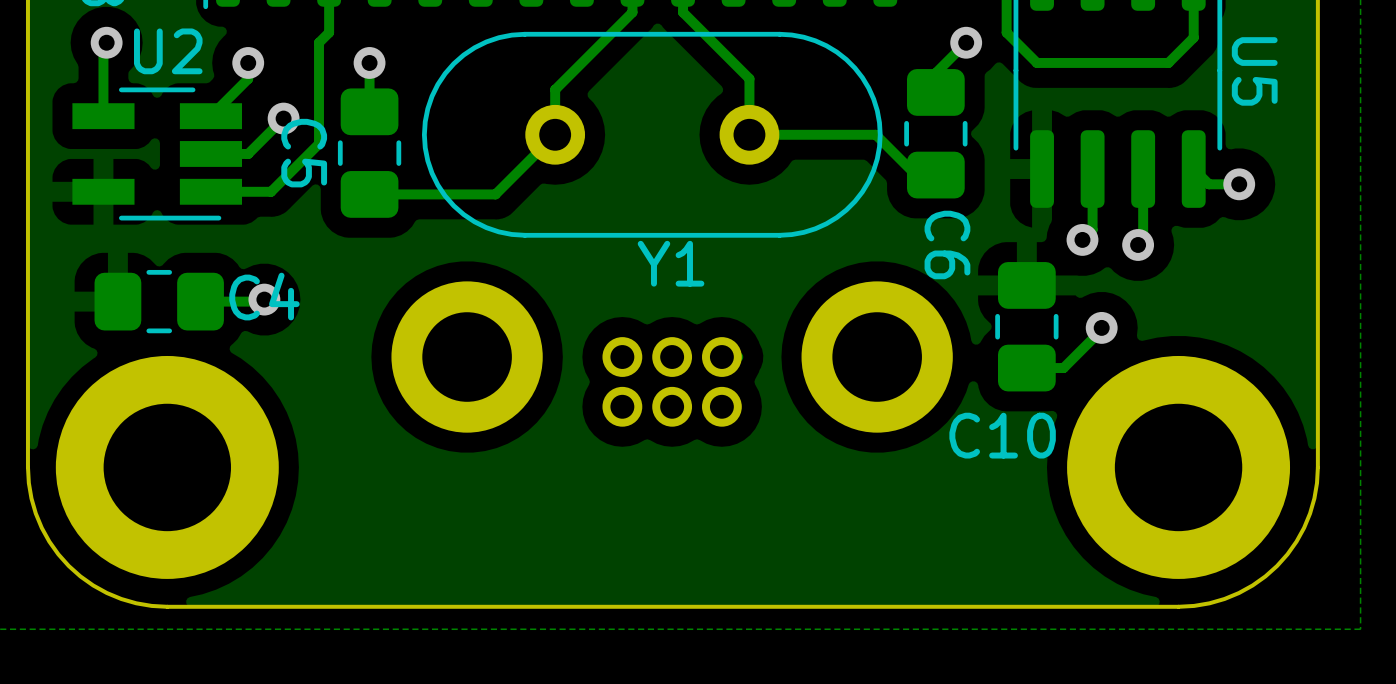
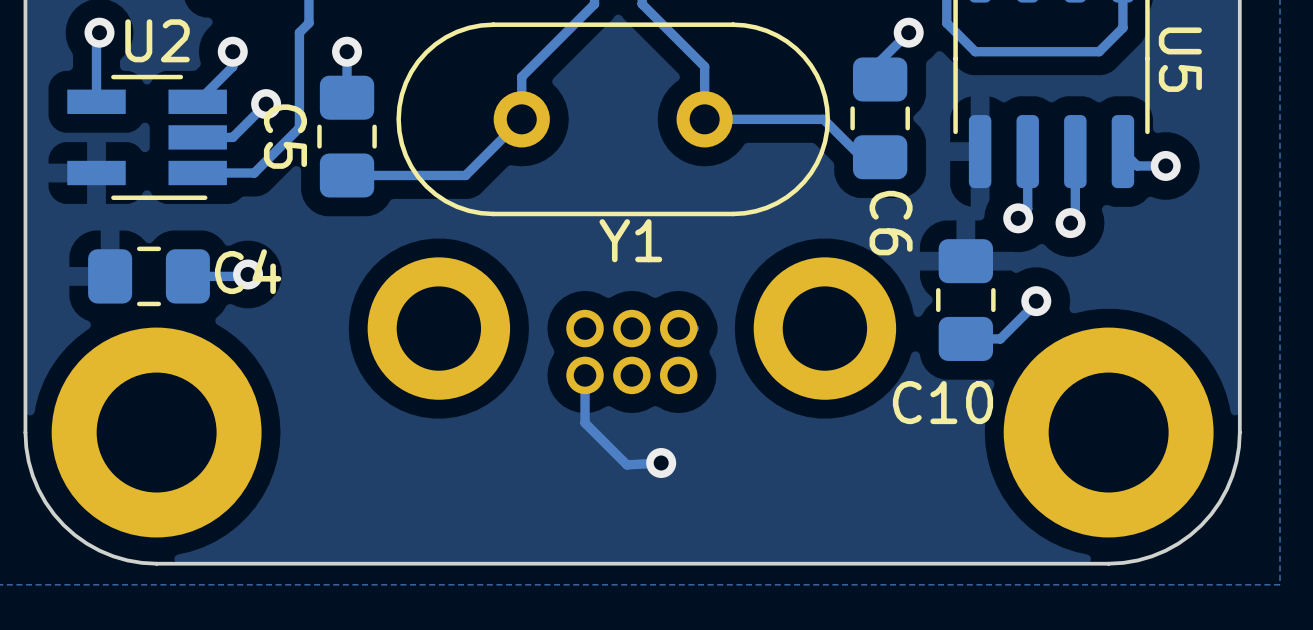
track: none -> (585, 375) (585, 423) (626, 464) (661, 462) (663, 464)
via: none -> (661, 462)

